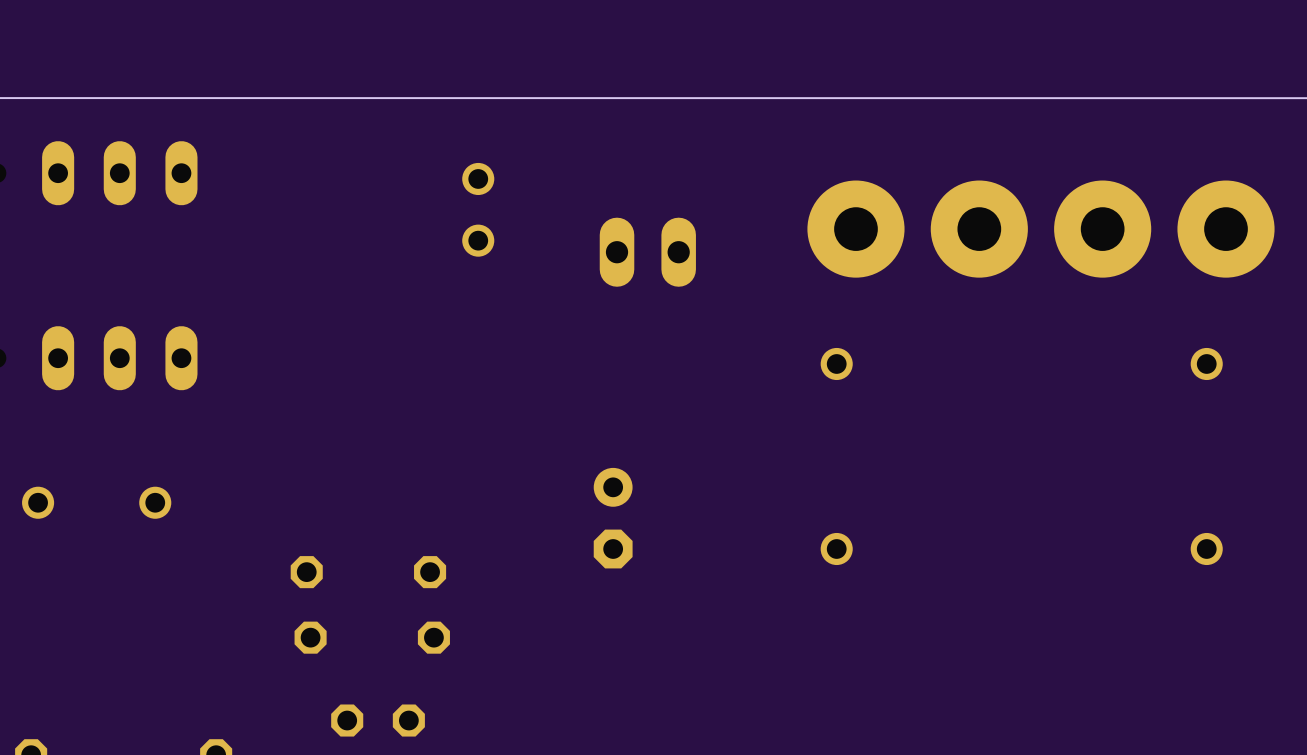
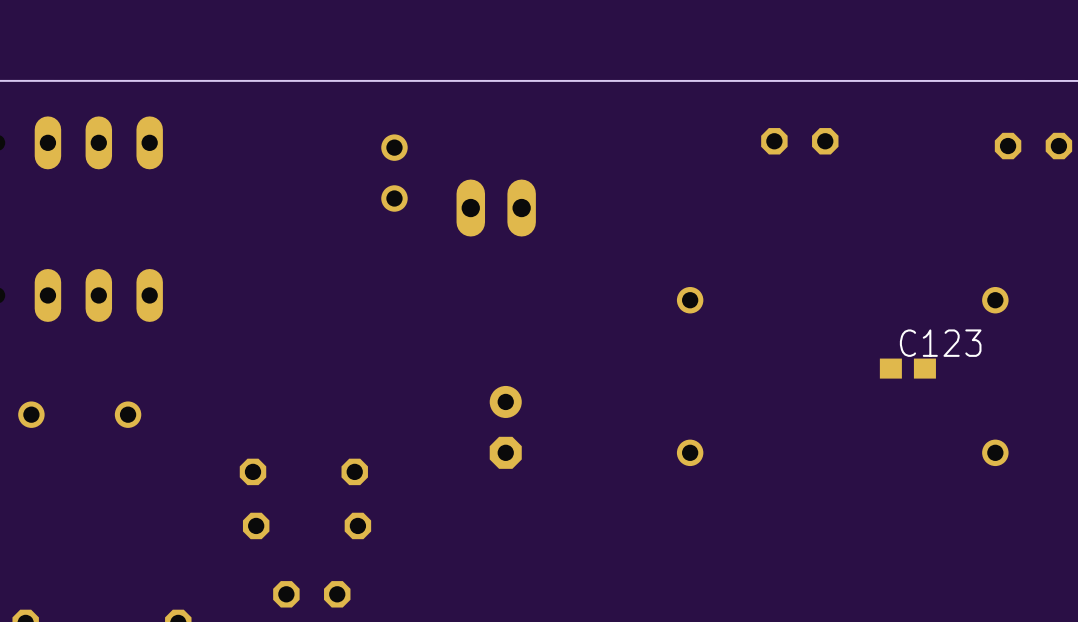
part: none -> (799, 141)
part: none -> (1033, 146)
part: (1040, 229) -> none
part position: (647, 252) -> (496, 208)
C123: none -> (907, 368)

